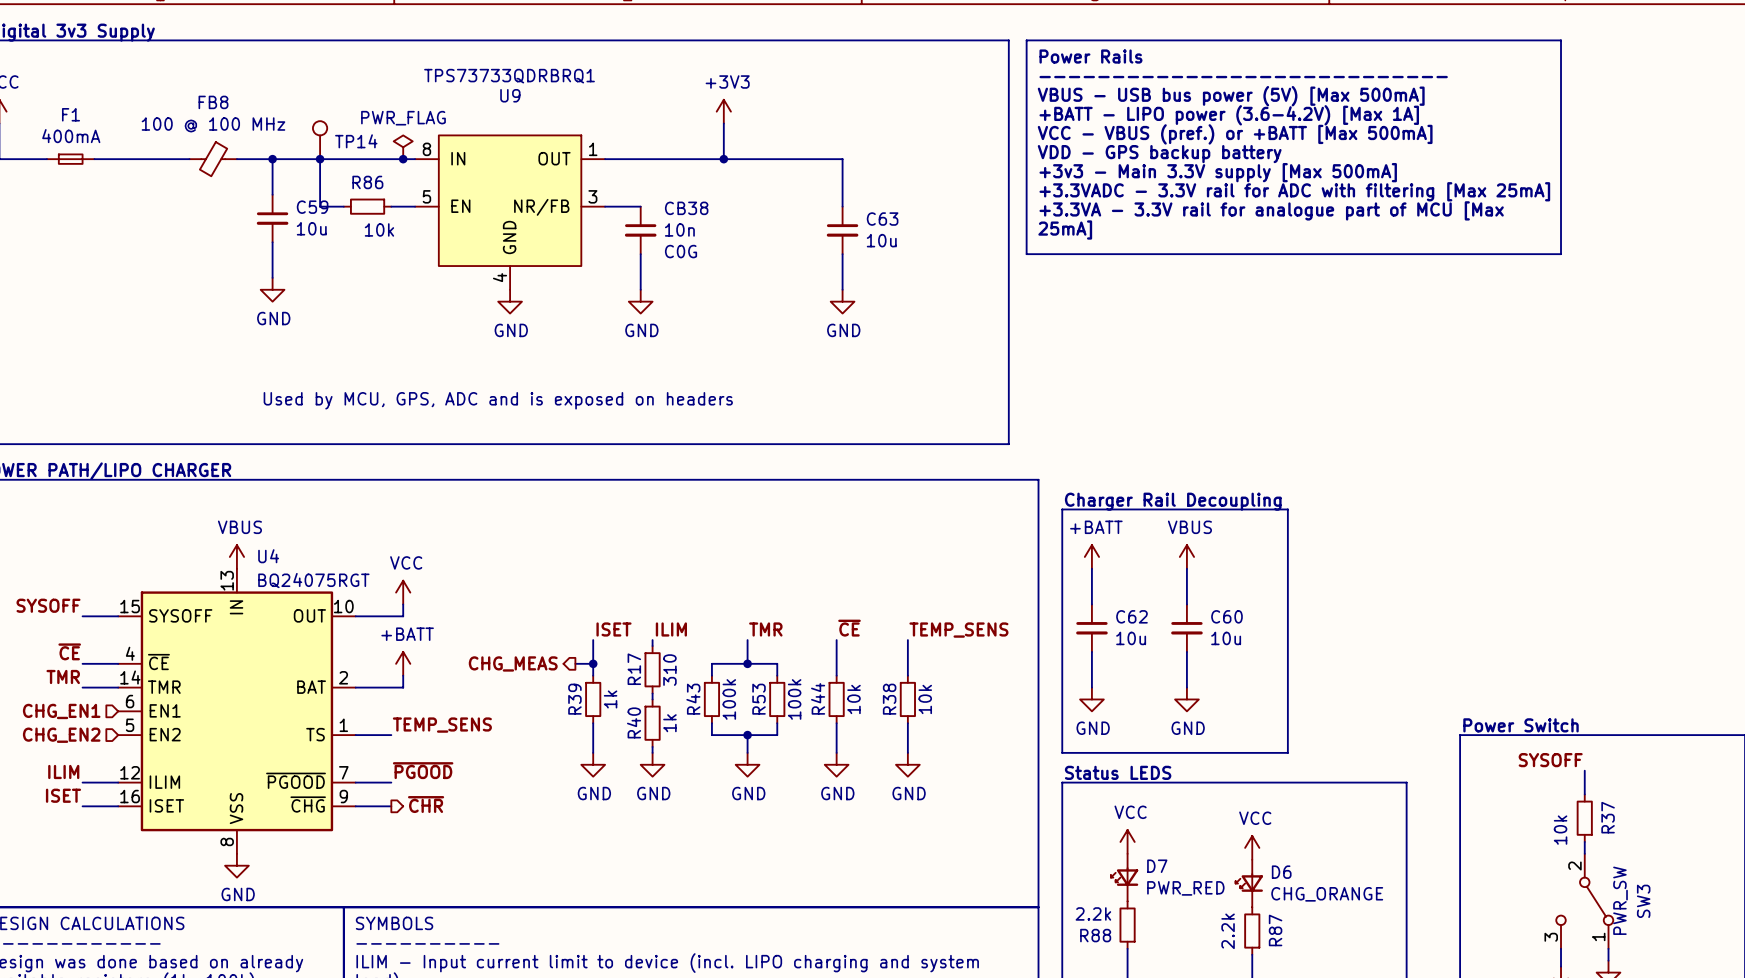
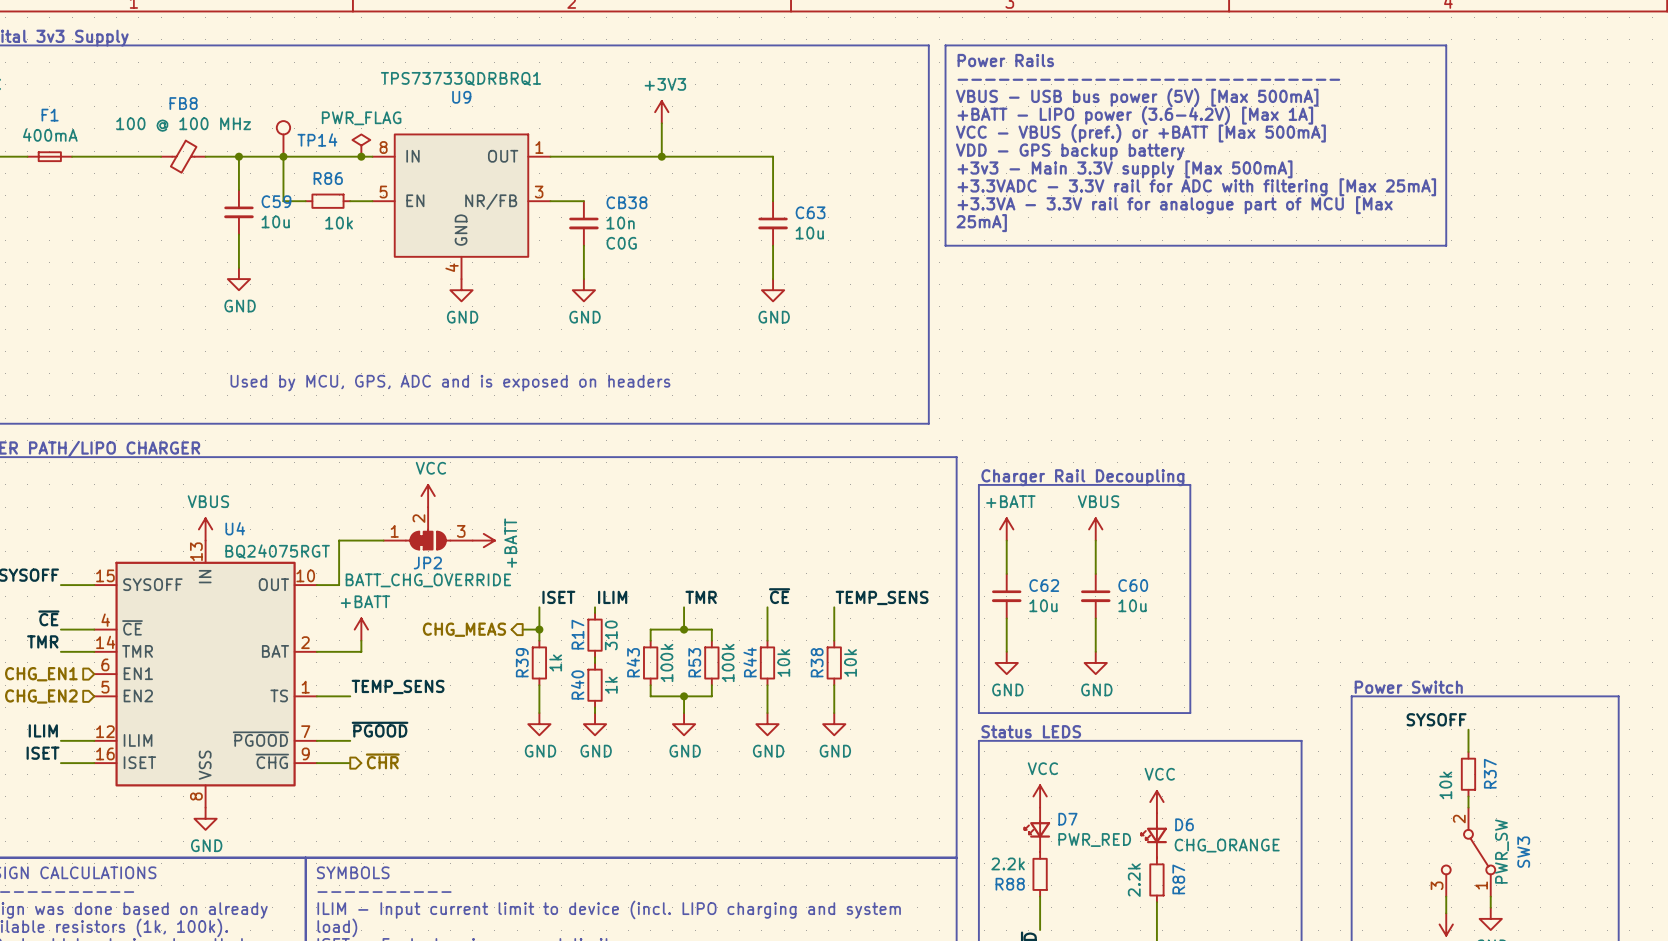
JP2: none -> BATT_CHG_OVERRIDE (428, 528)
power symbol: none -> +BATT (483, 540)
power symbol position: VCC (403, 592) -> VCC (428, 496)
wire: (403, 604) (403, 616) (379, 616) -> (383, 540) (339, 540) (339, 585)

